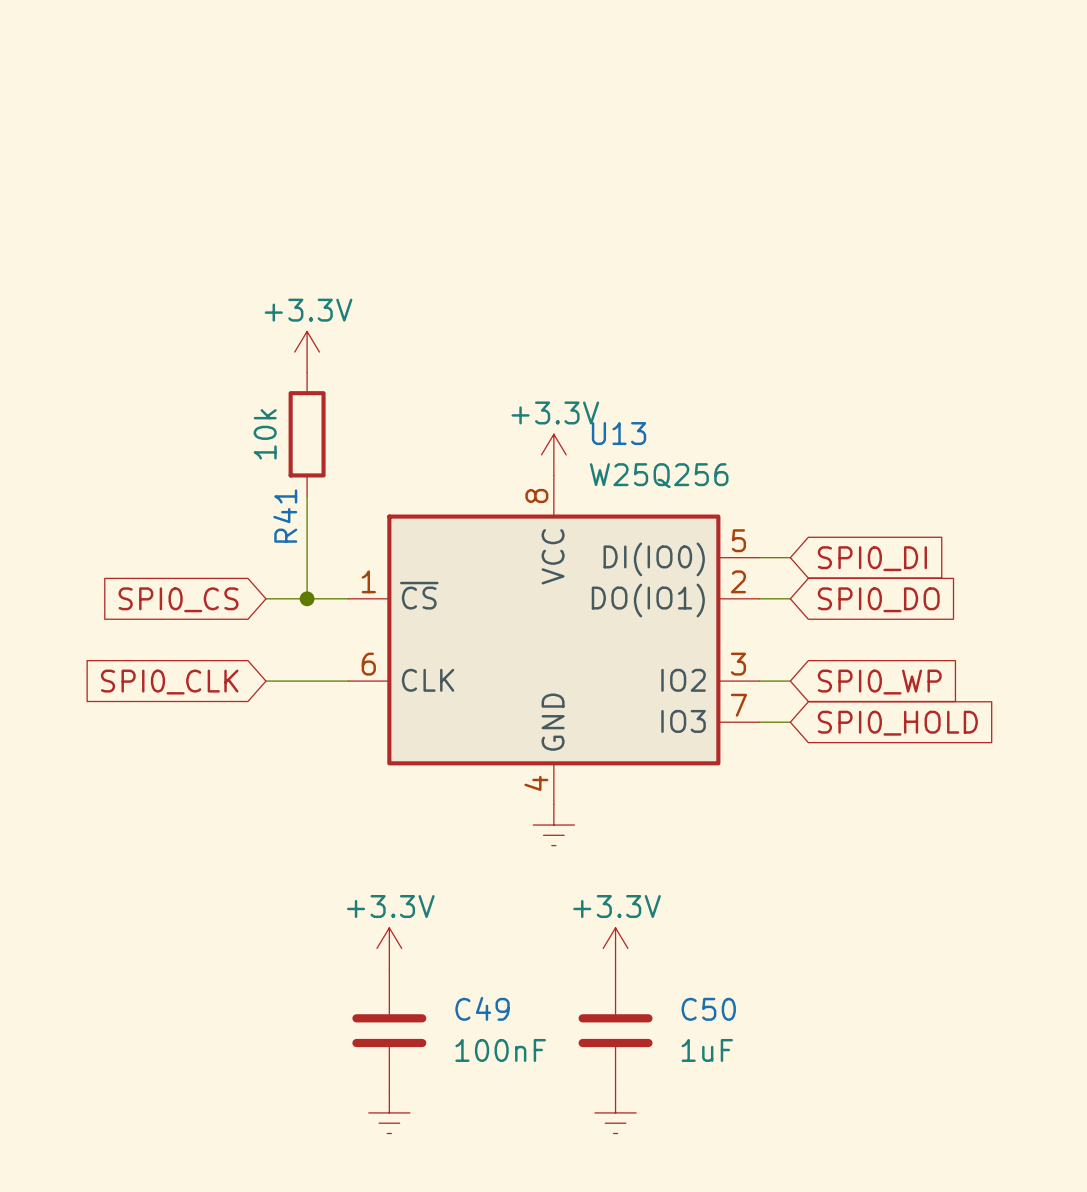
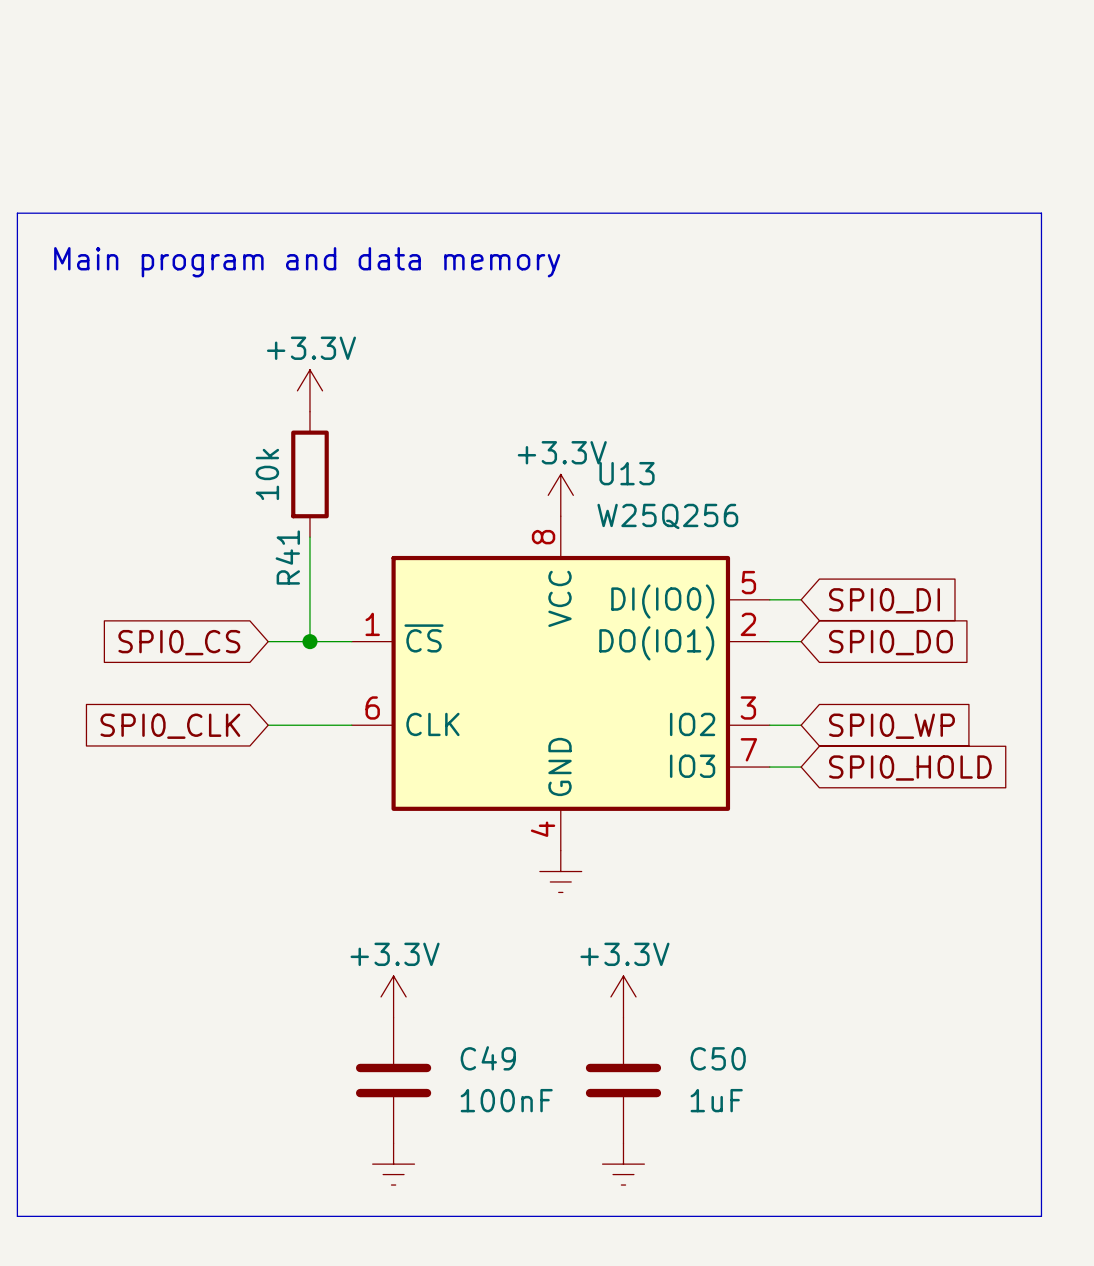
line: none -> (17, 213) (1041, 213) (1041, 1216) (17, 1216) (17, 213)
text: none -> Main program and data memory (307, 262)

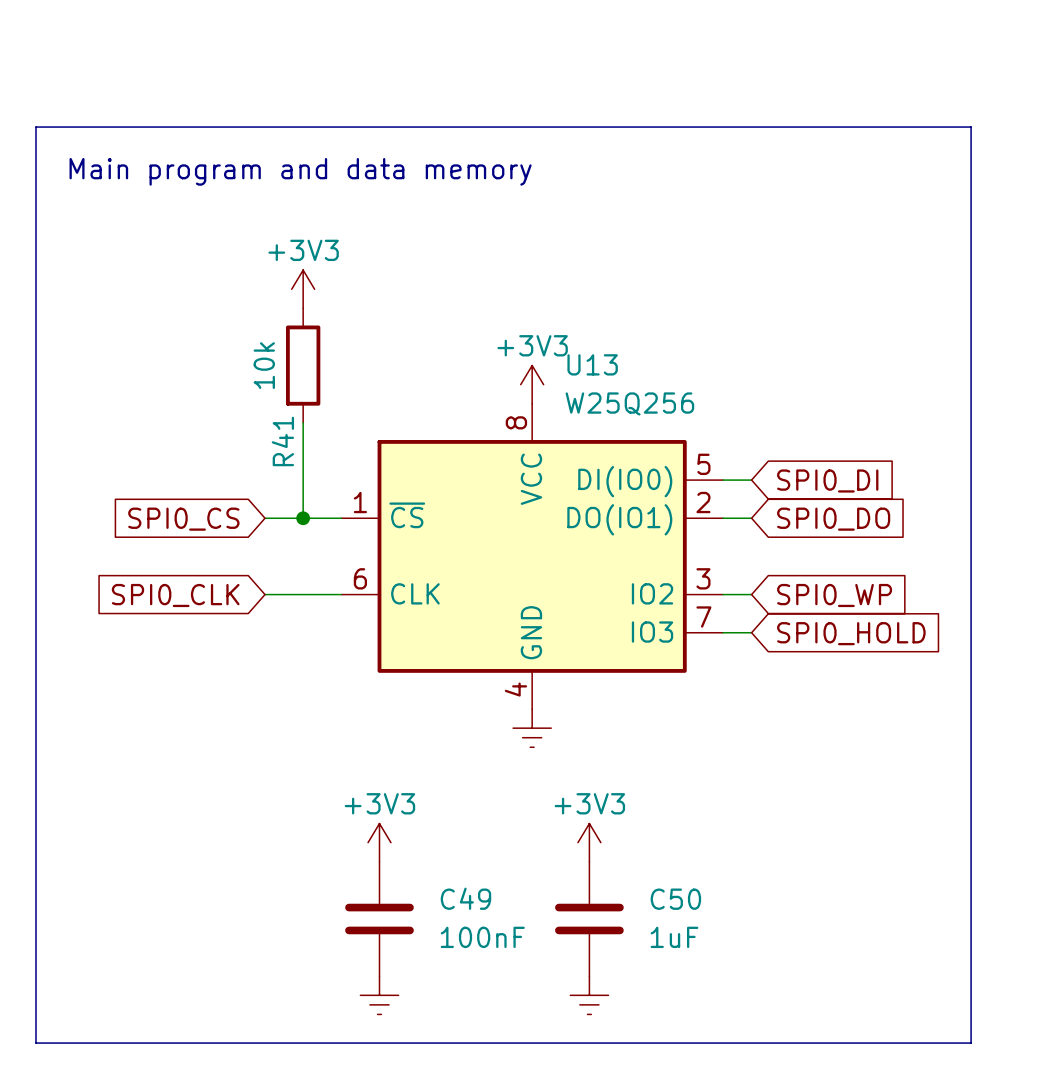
power symbol: +3.3V (309, 390) -> +3V3 (303, 289)
power symbol: +3.3V (560, 495) -> +3V3 (532, 384)
power symbol: +3.3V (393, 996) -> +3V3 (379, 842)
power symbol: +3.3V (623, 996) -> +3V3 (589, 842)

